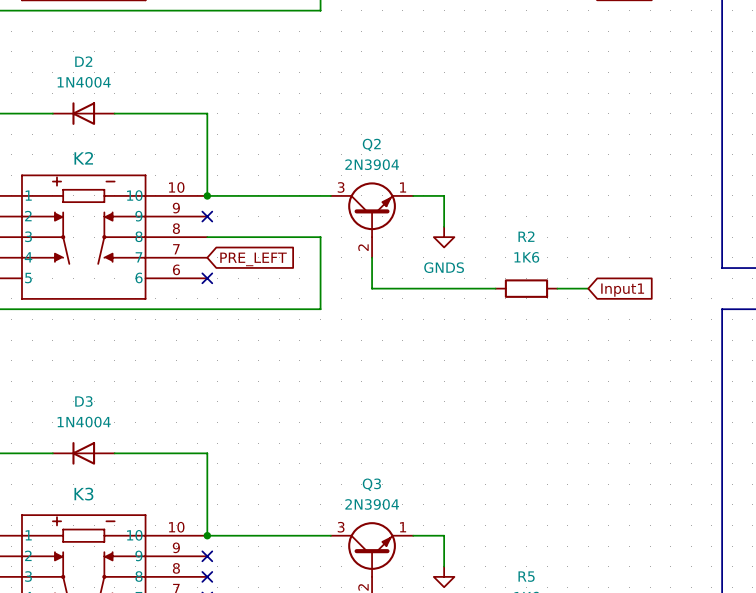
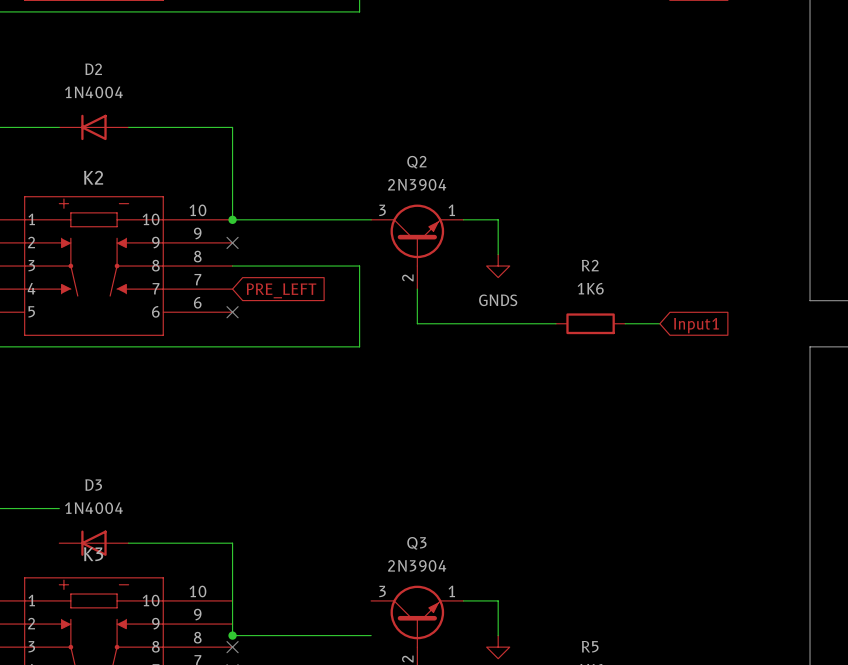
D3 position: (83, 453) -> (93, 543)
wire: (114, 453) (207, 453) (207, 484) -> (128, 543) (232, 543)
wire: (207, 535) (330, 535) -> (232, 600) (232, 635) (371, 635)
junction position: (207, 535) -> (232, 635)
no-connect mark: (207, 556) -> none

